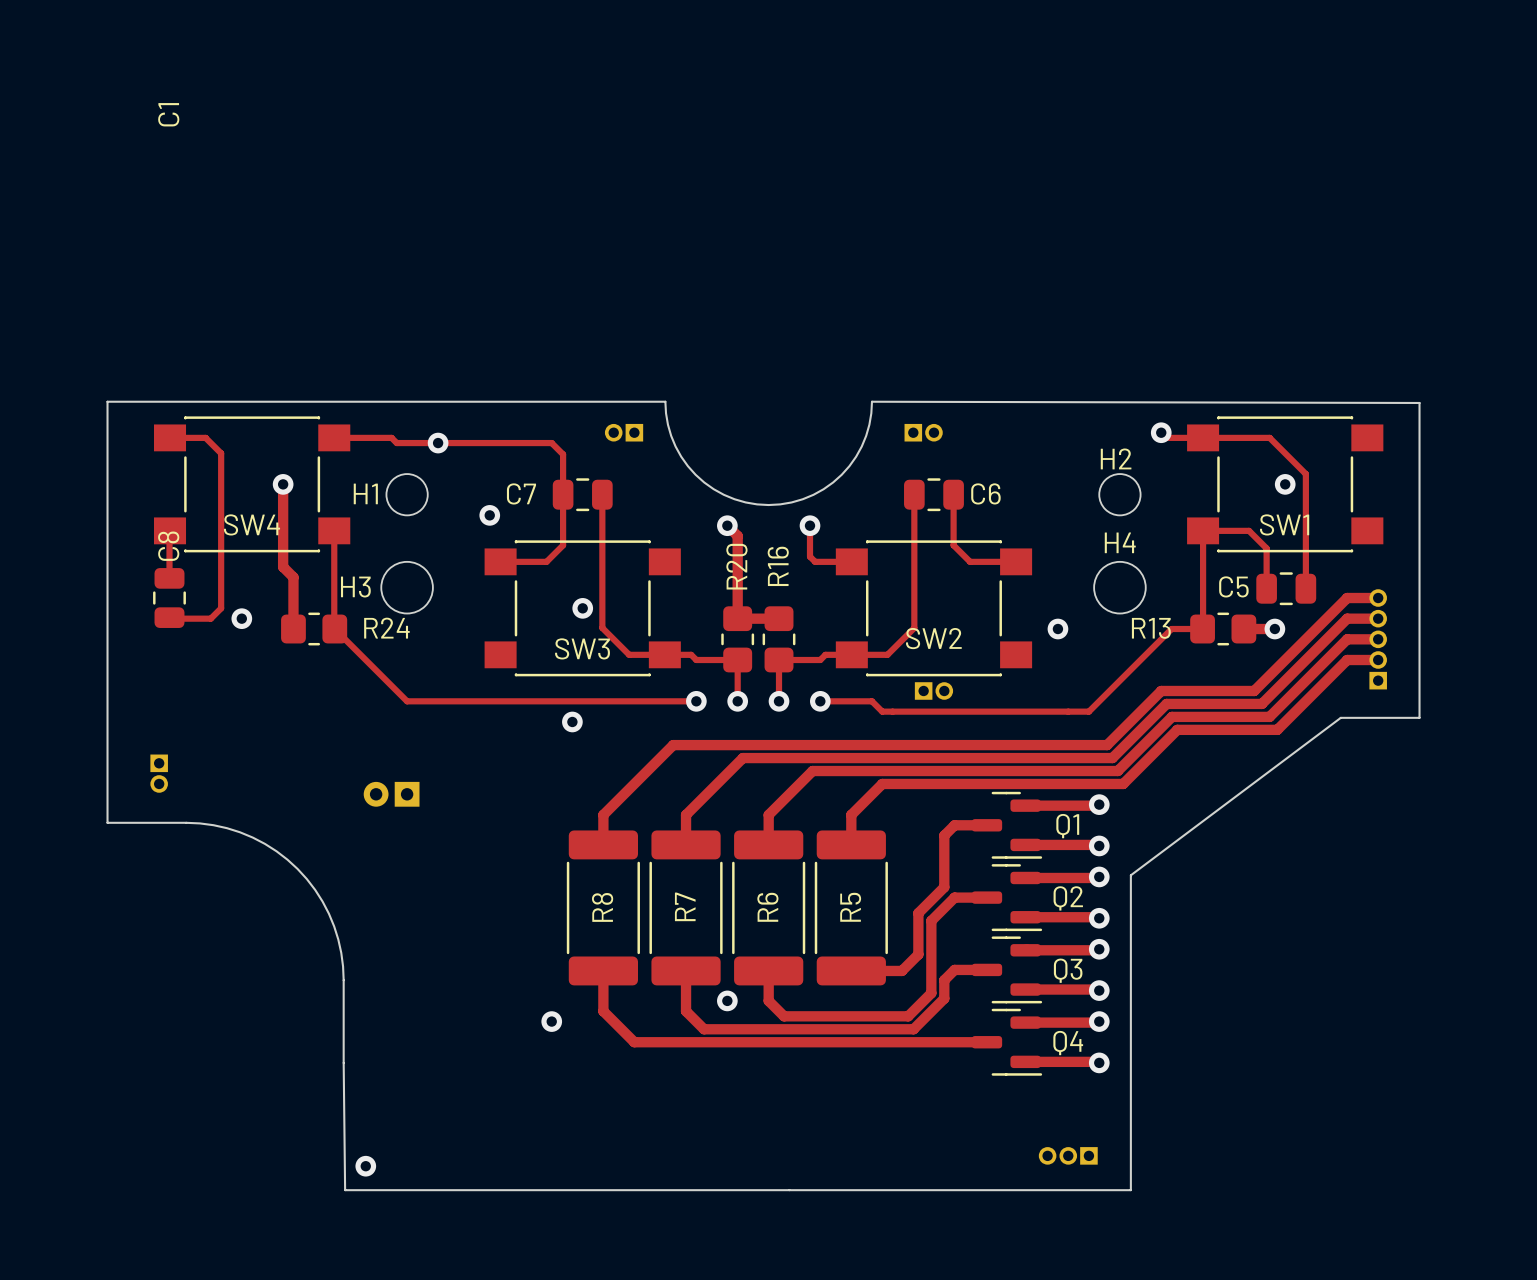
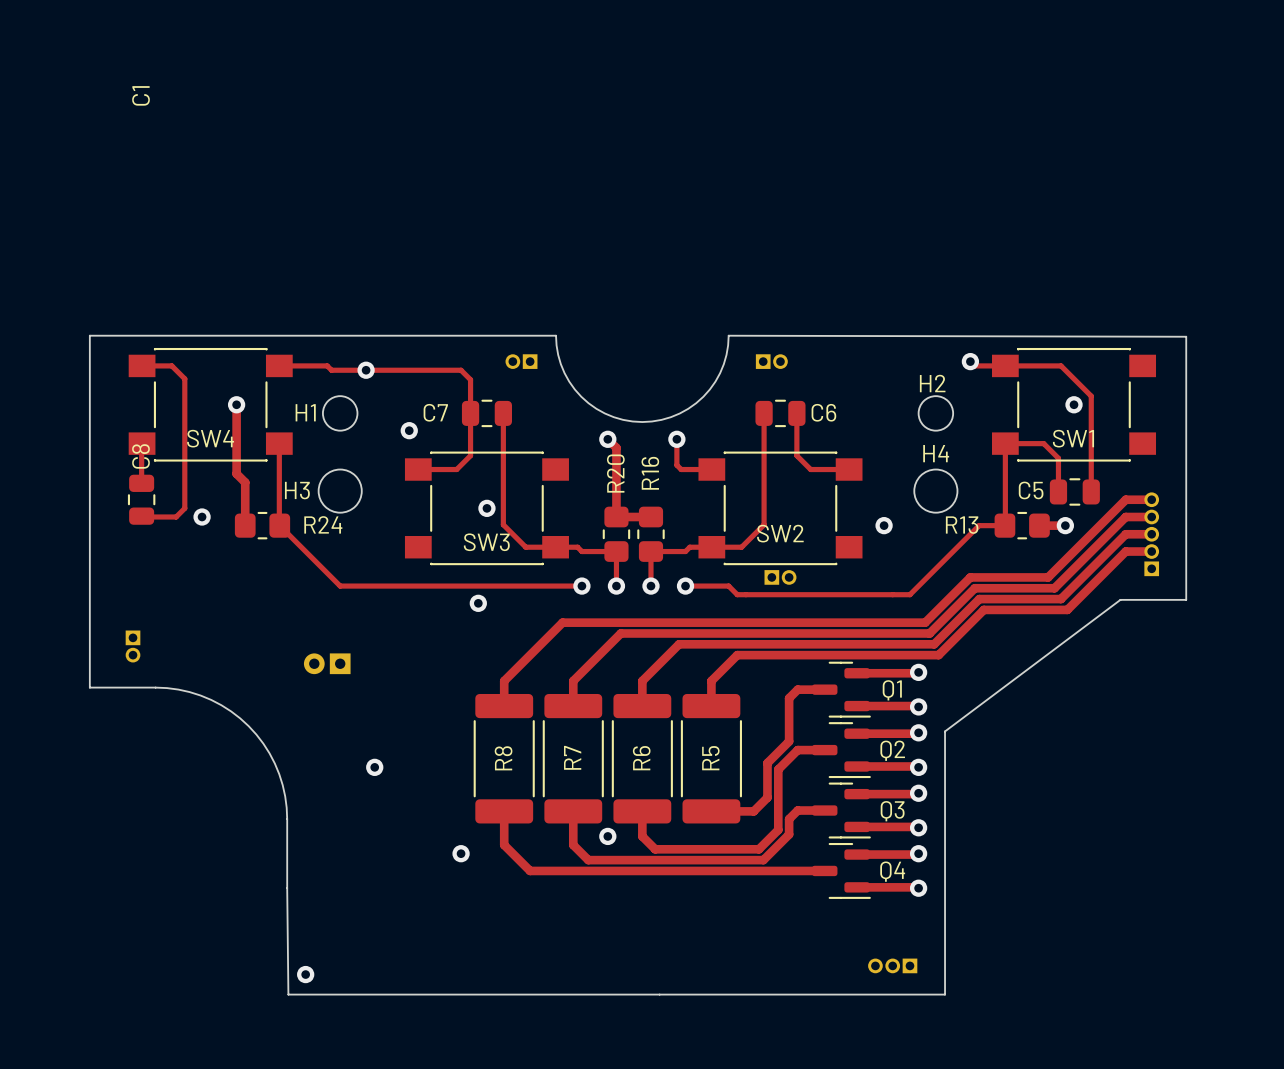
via: none -> (374, 767)

